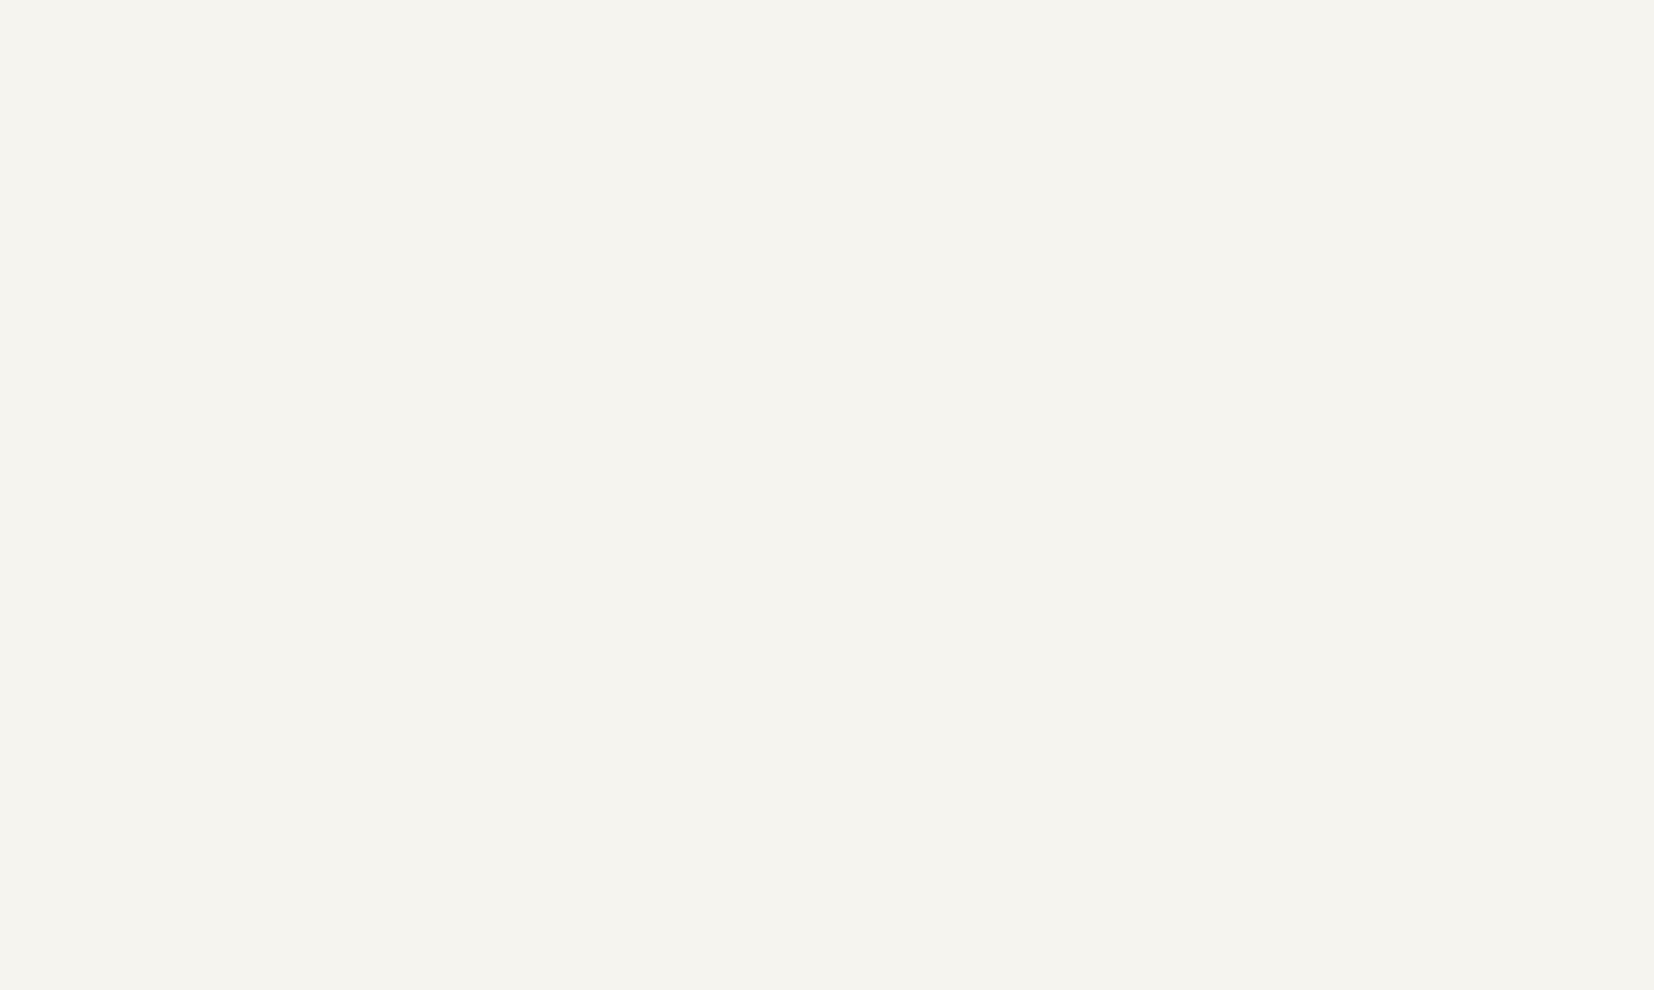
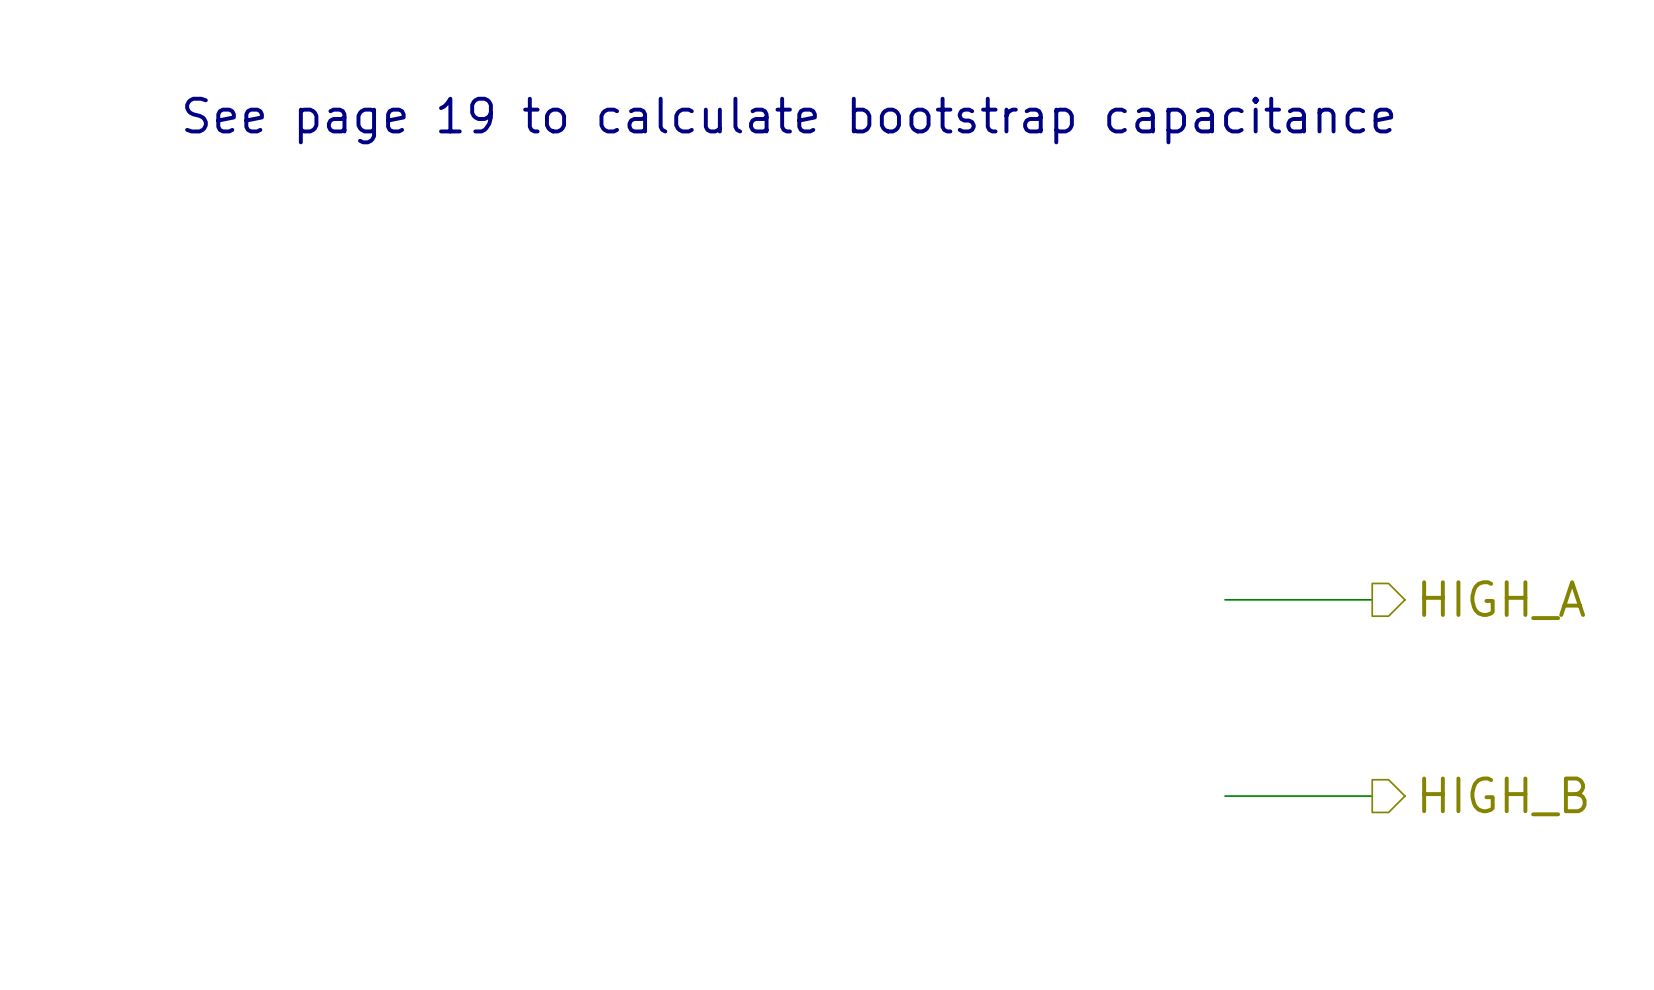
text: none -> See page 19 to calculate bootstrap capacitance (789, 120)
wire: none -> (1225, 599) (1372, 599)
hierarchical label: none -> HIGH_A (1503, 600)
wire: none -> (1225, 796) (1372, 796)
hierarchical label: none -> HIGH_B (1504, 796)

